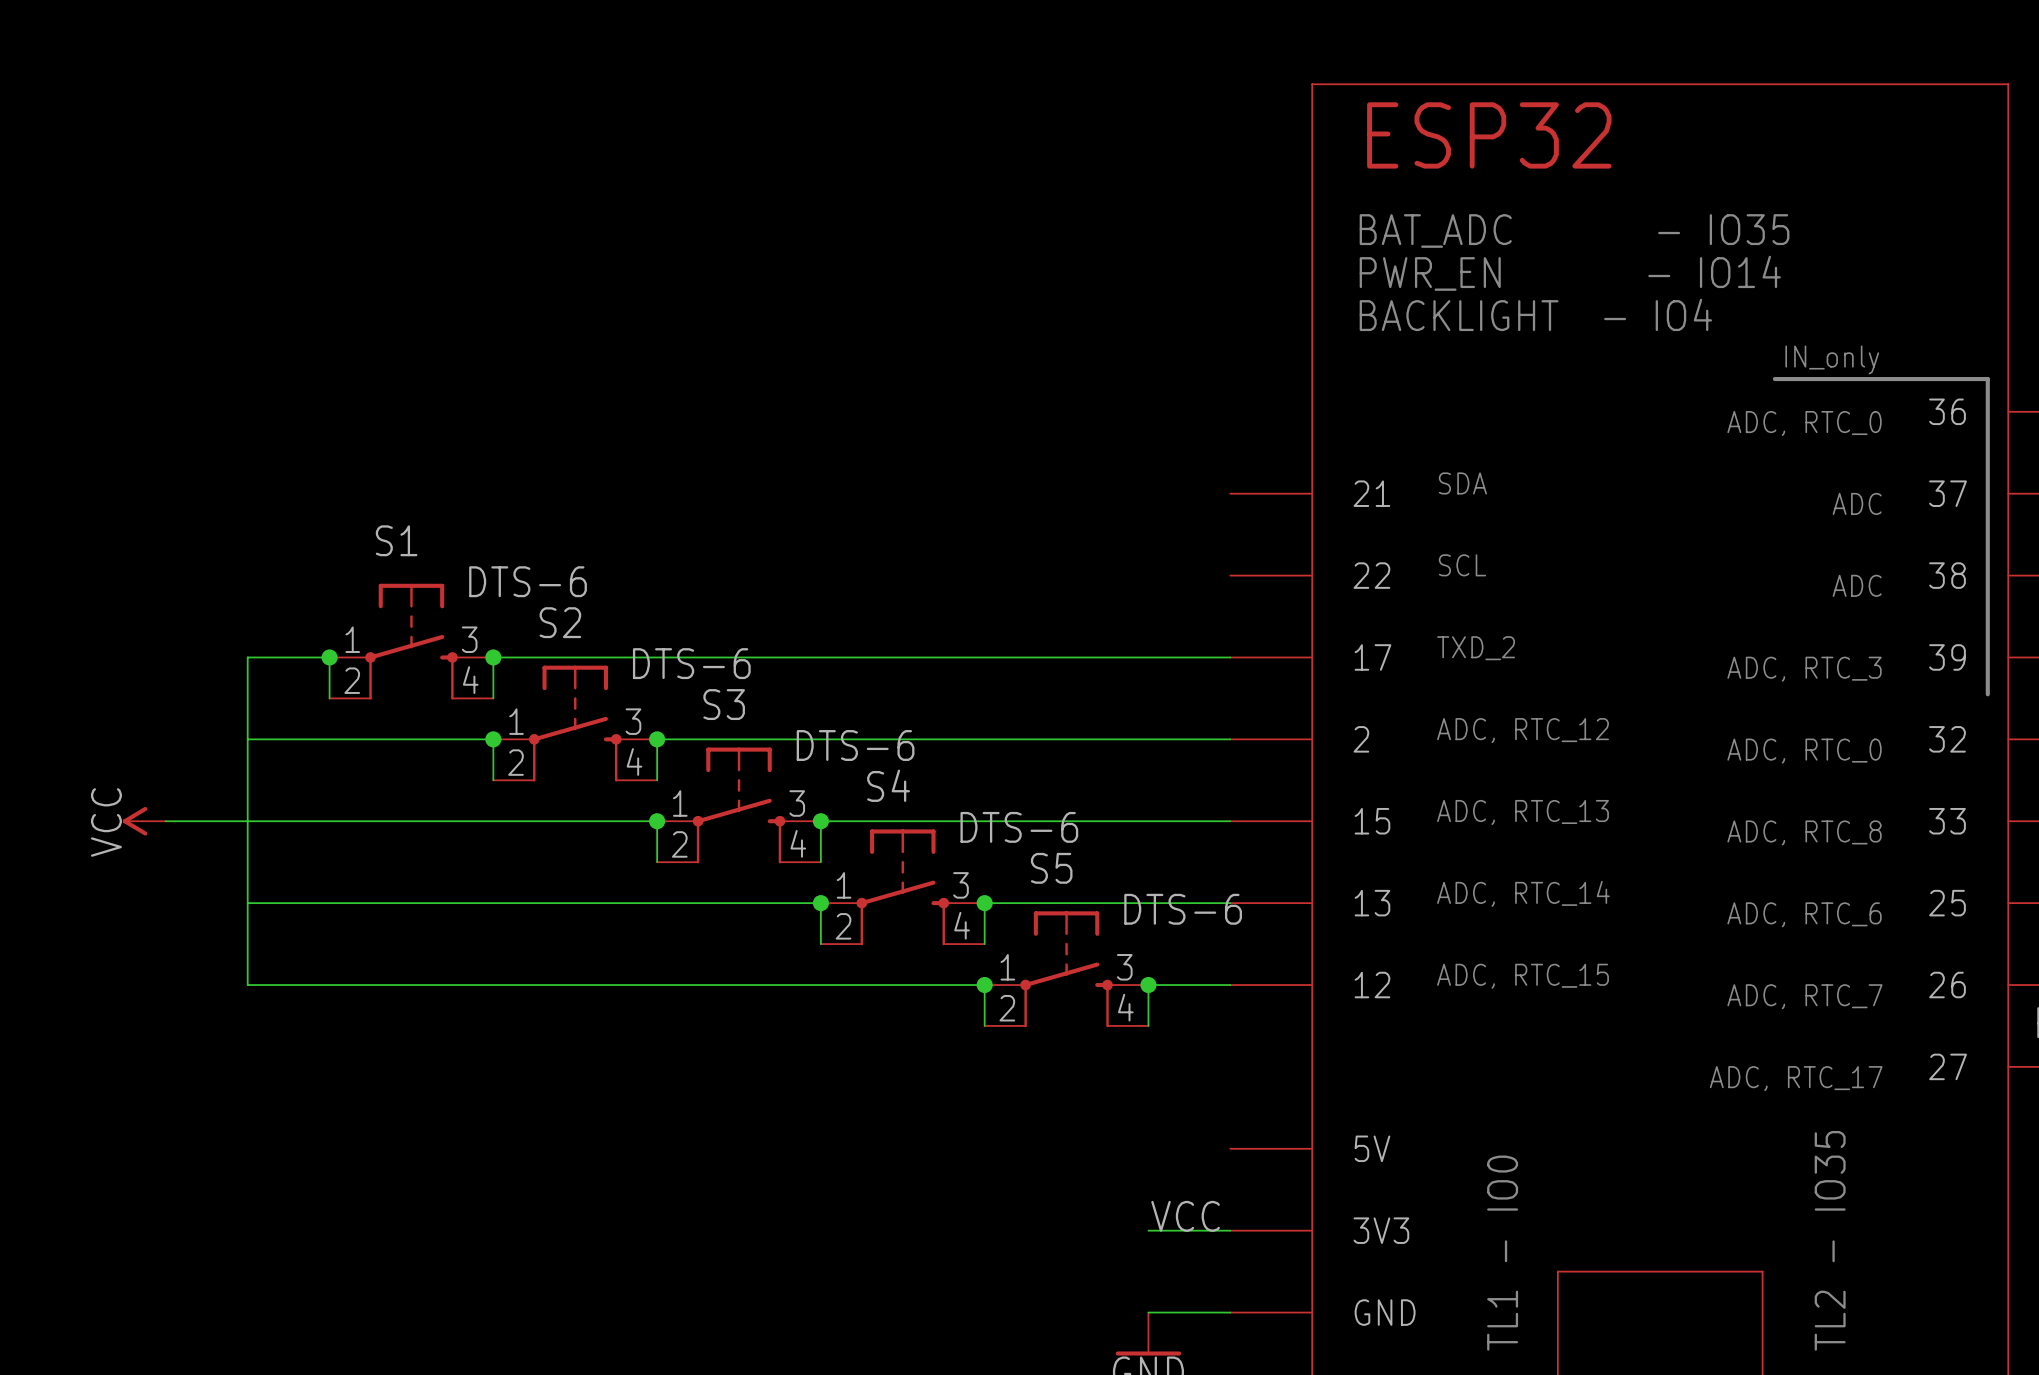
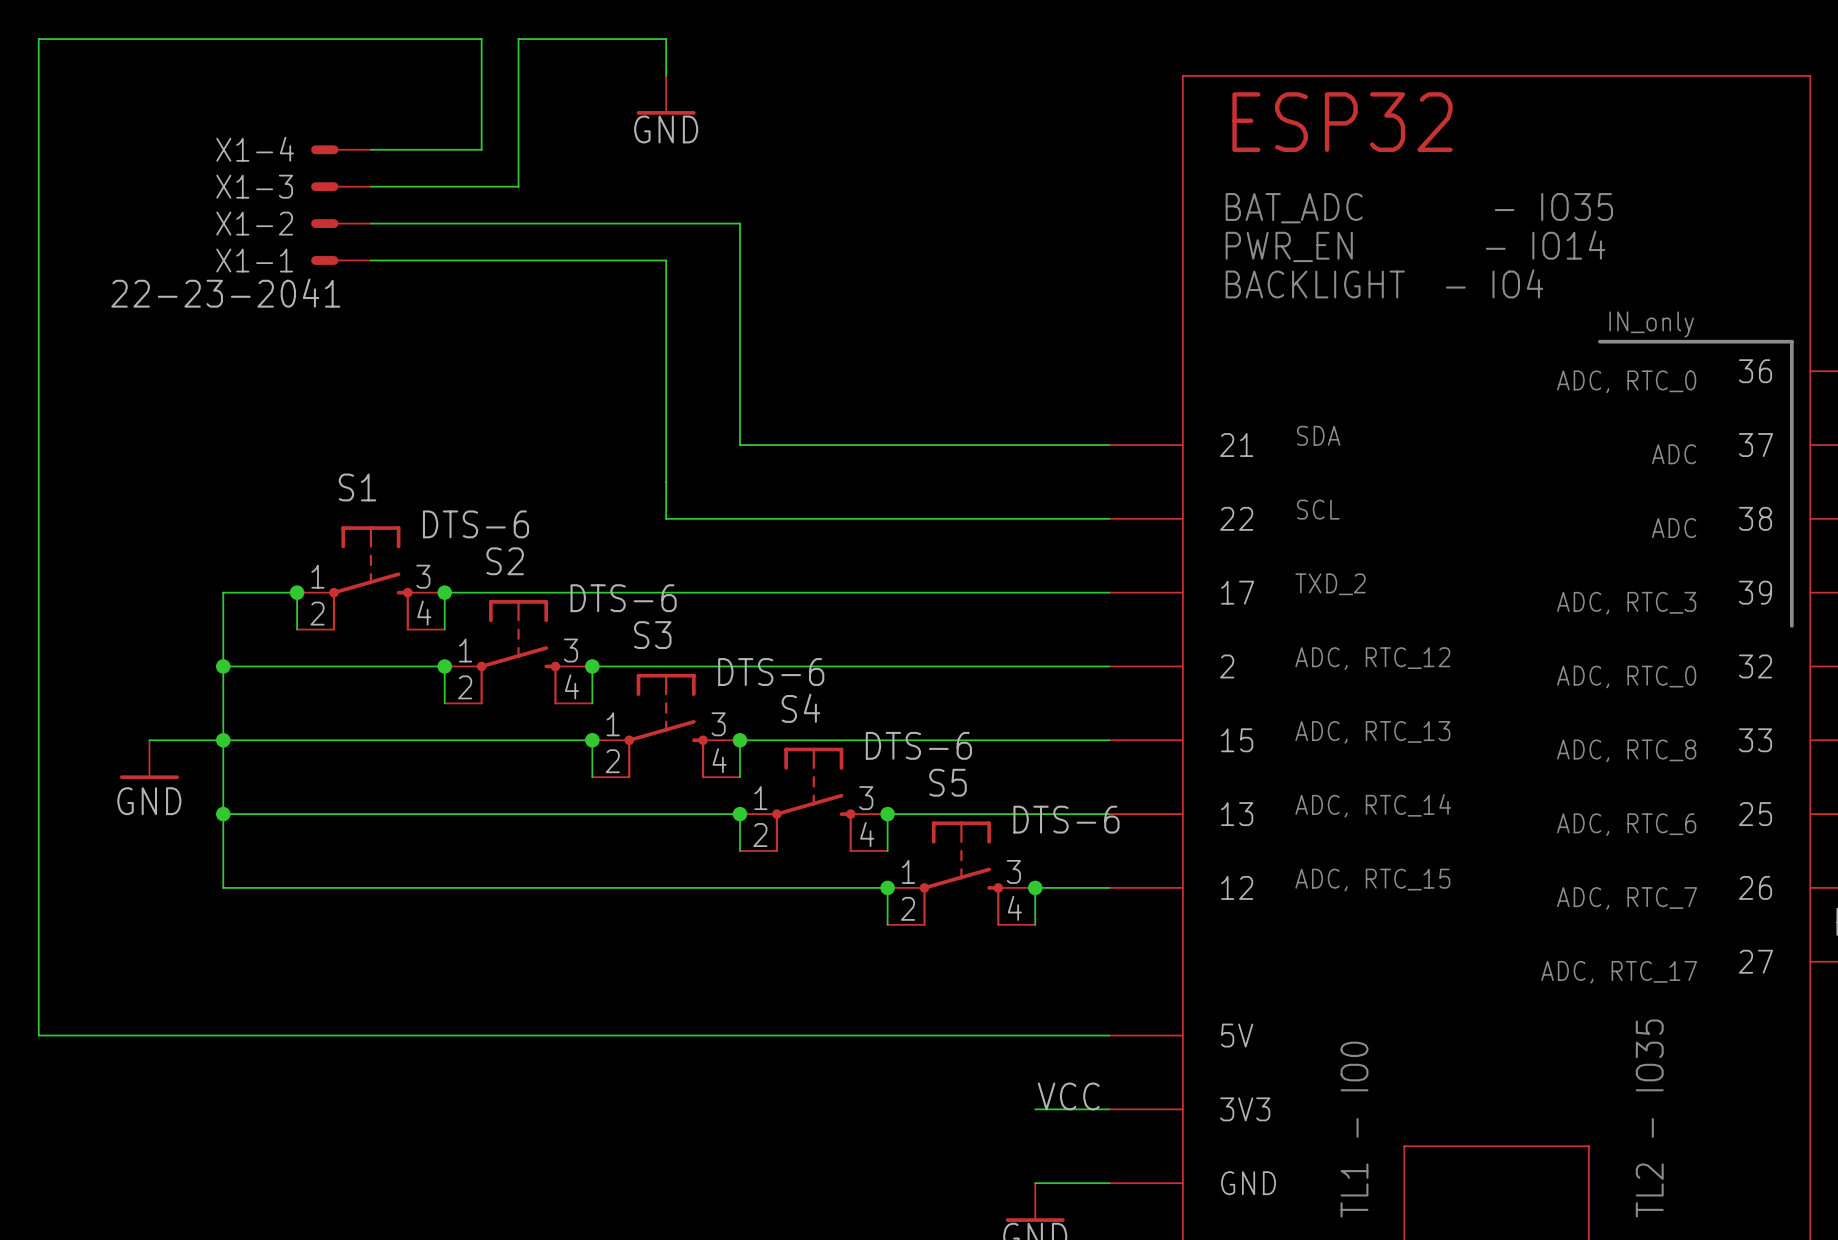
wire: none -> (666, 75) (666, 39) (518, 39) (518, 186) (370, 186)
power symbol: none -> GND (666, 95)
X1-4: none -> (341, 149)
wire: none -> (370, 149) (481, 149) (481, 39) (38, 39) (38, 1035) (1109, 1035)
X1-3: none -> (341, 186)
X1-2: none -> (341, 223)
wire: none -> (370, 223) (739, 223) (739, 445) (1109, 445)
X1-1: none -> 22-23-2041 (341, 260)
wire: none -> (370, 260) (666, 260) (666, 518) (1109, 518)
junction: none -> (223, 666)
power symbol: VCC (144, 821) -> none
junction: none -> (223, 740)
power symbol: none -> GND (149, 759)
junction: none -> (223, 814)

